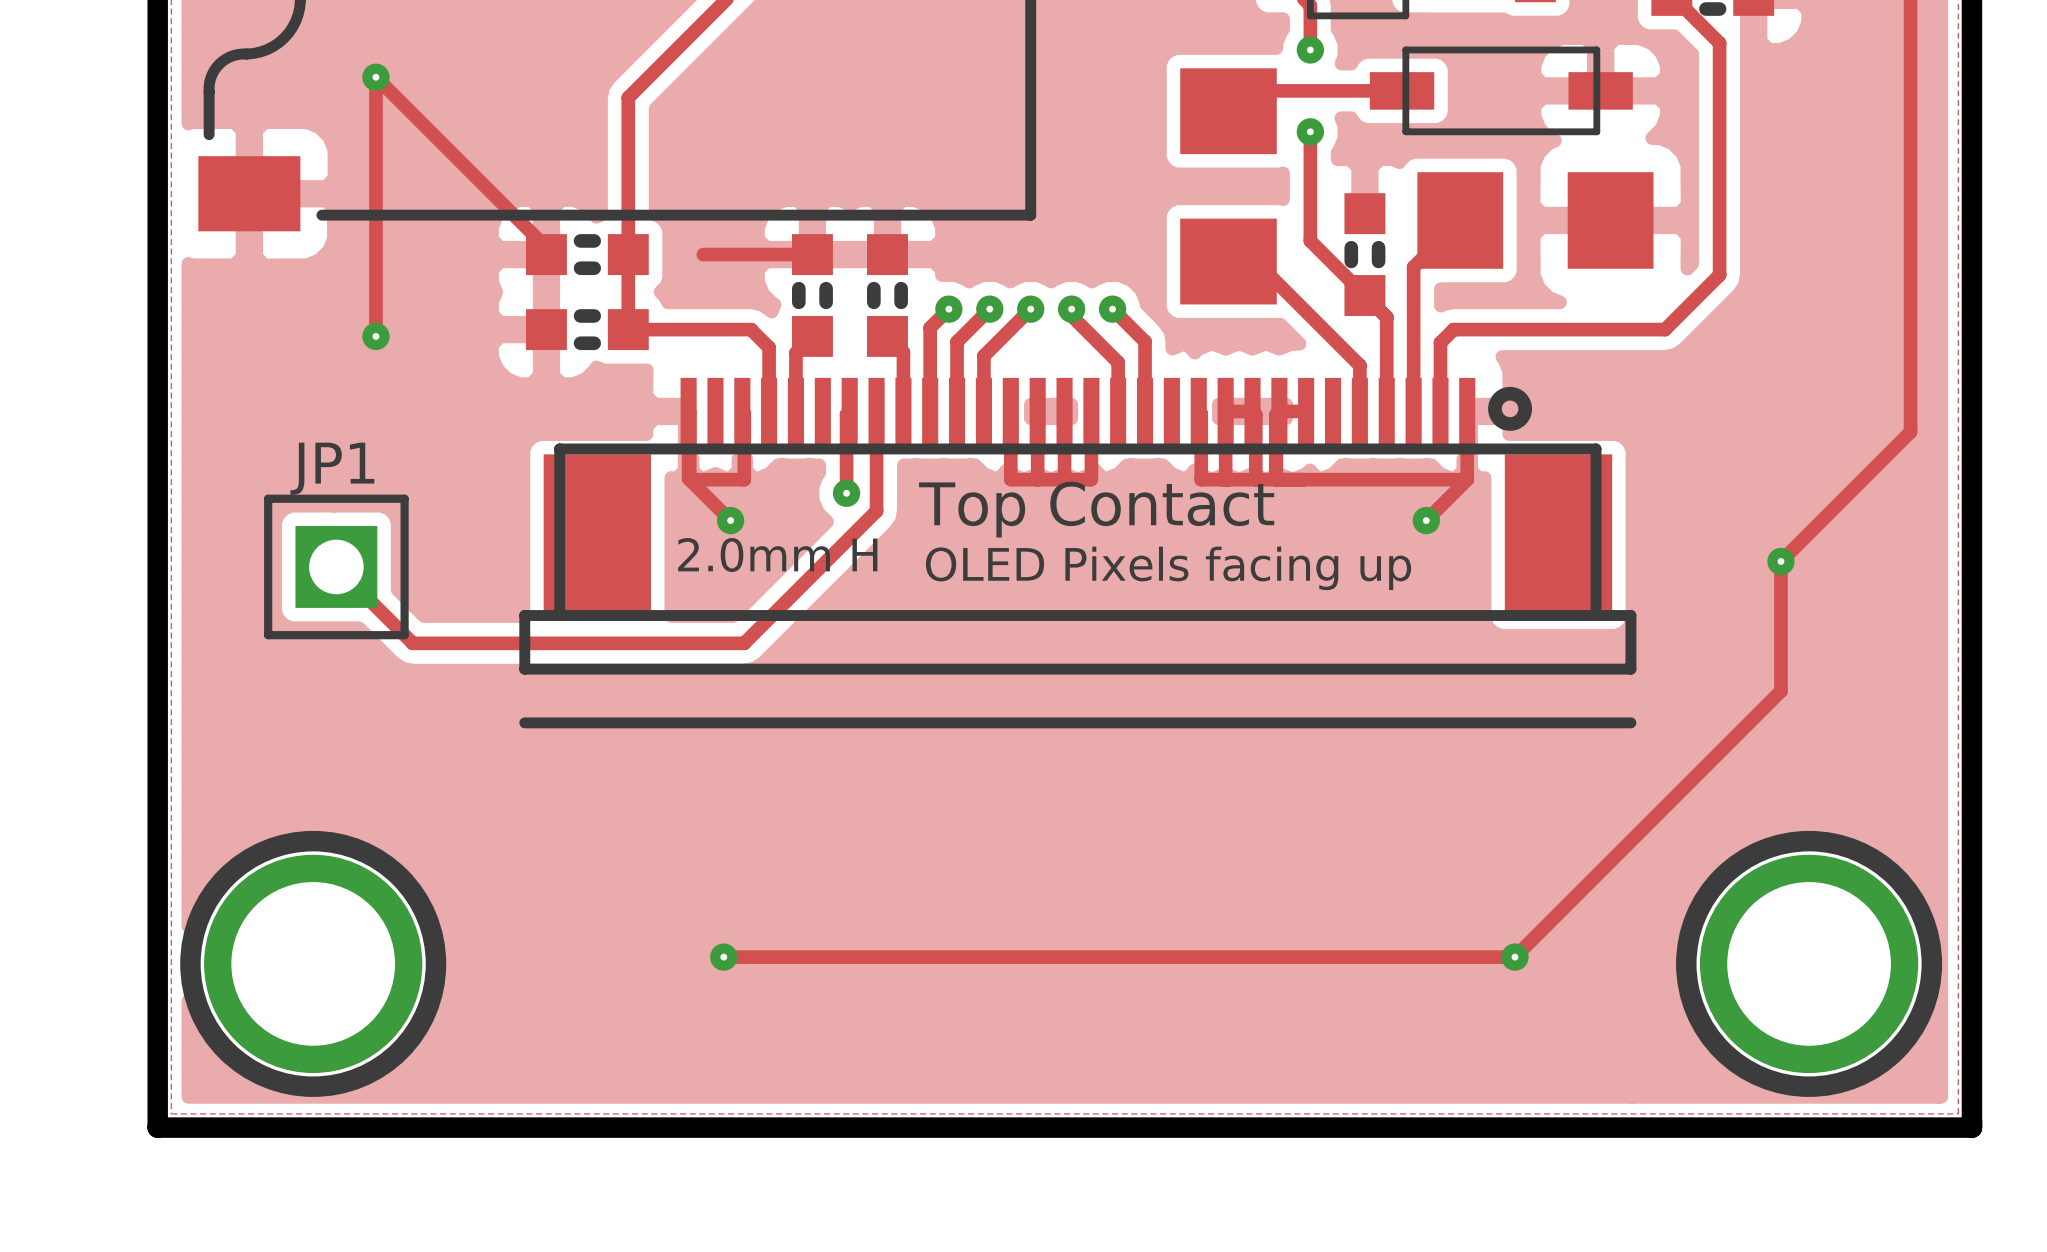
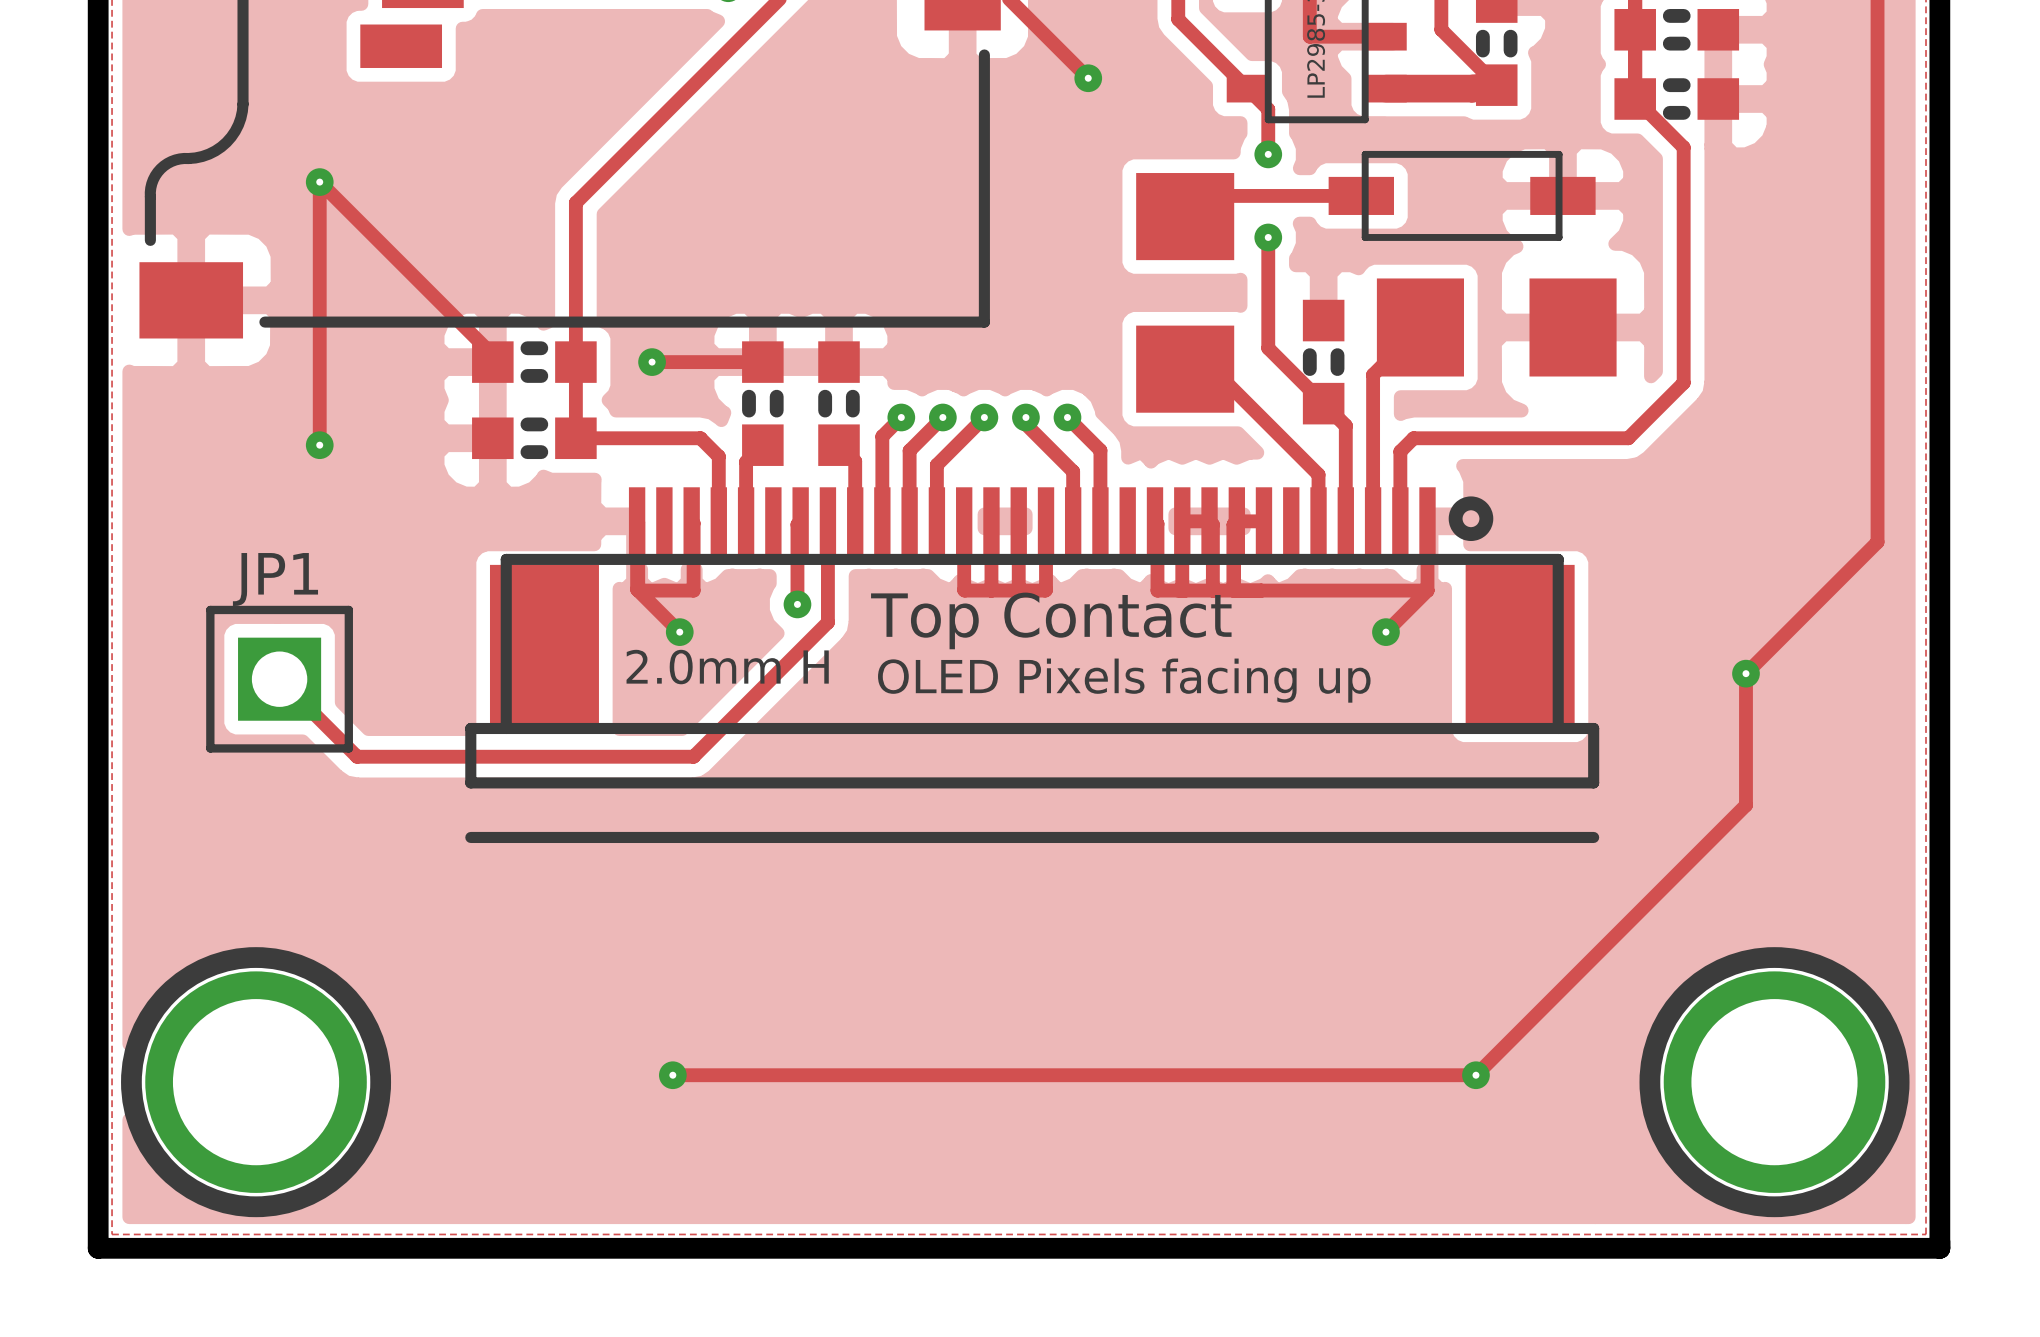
via: none -> (652, 362)

